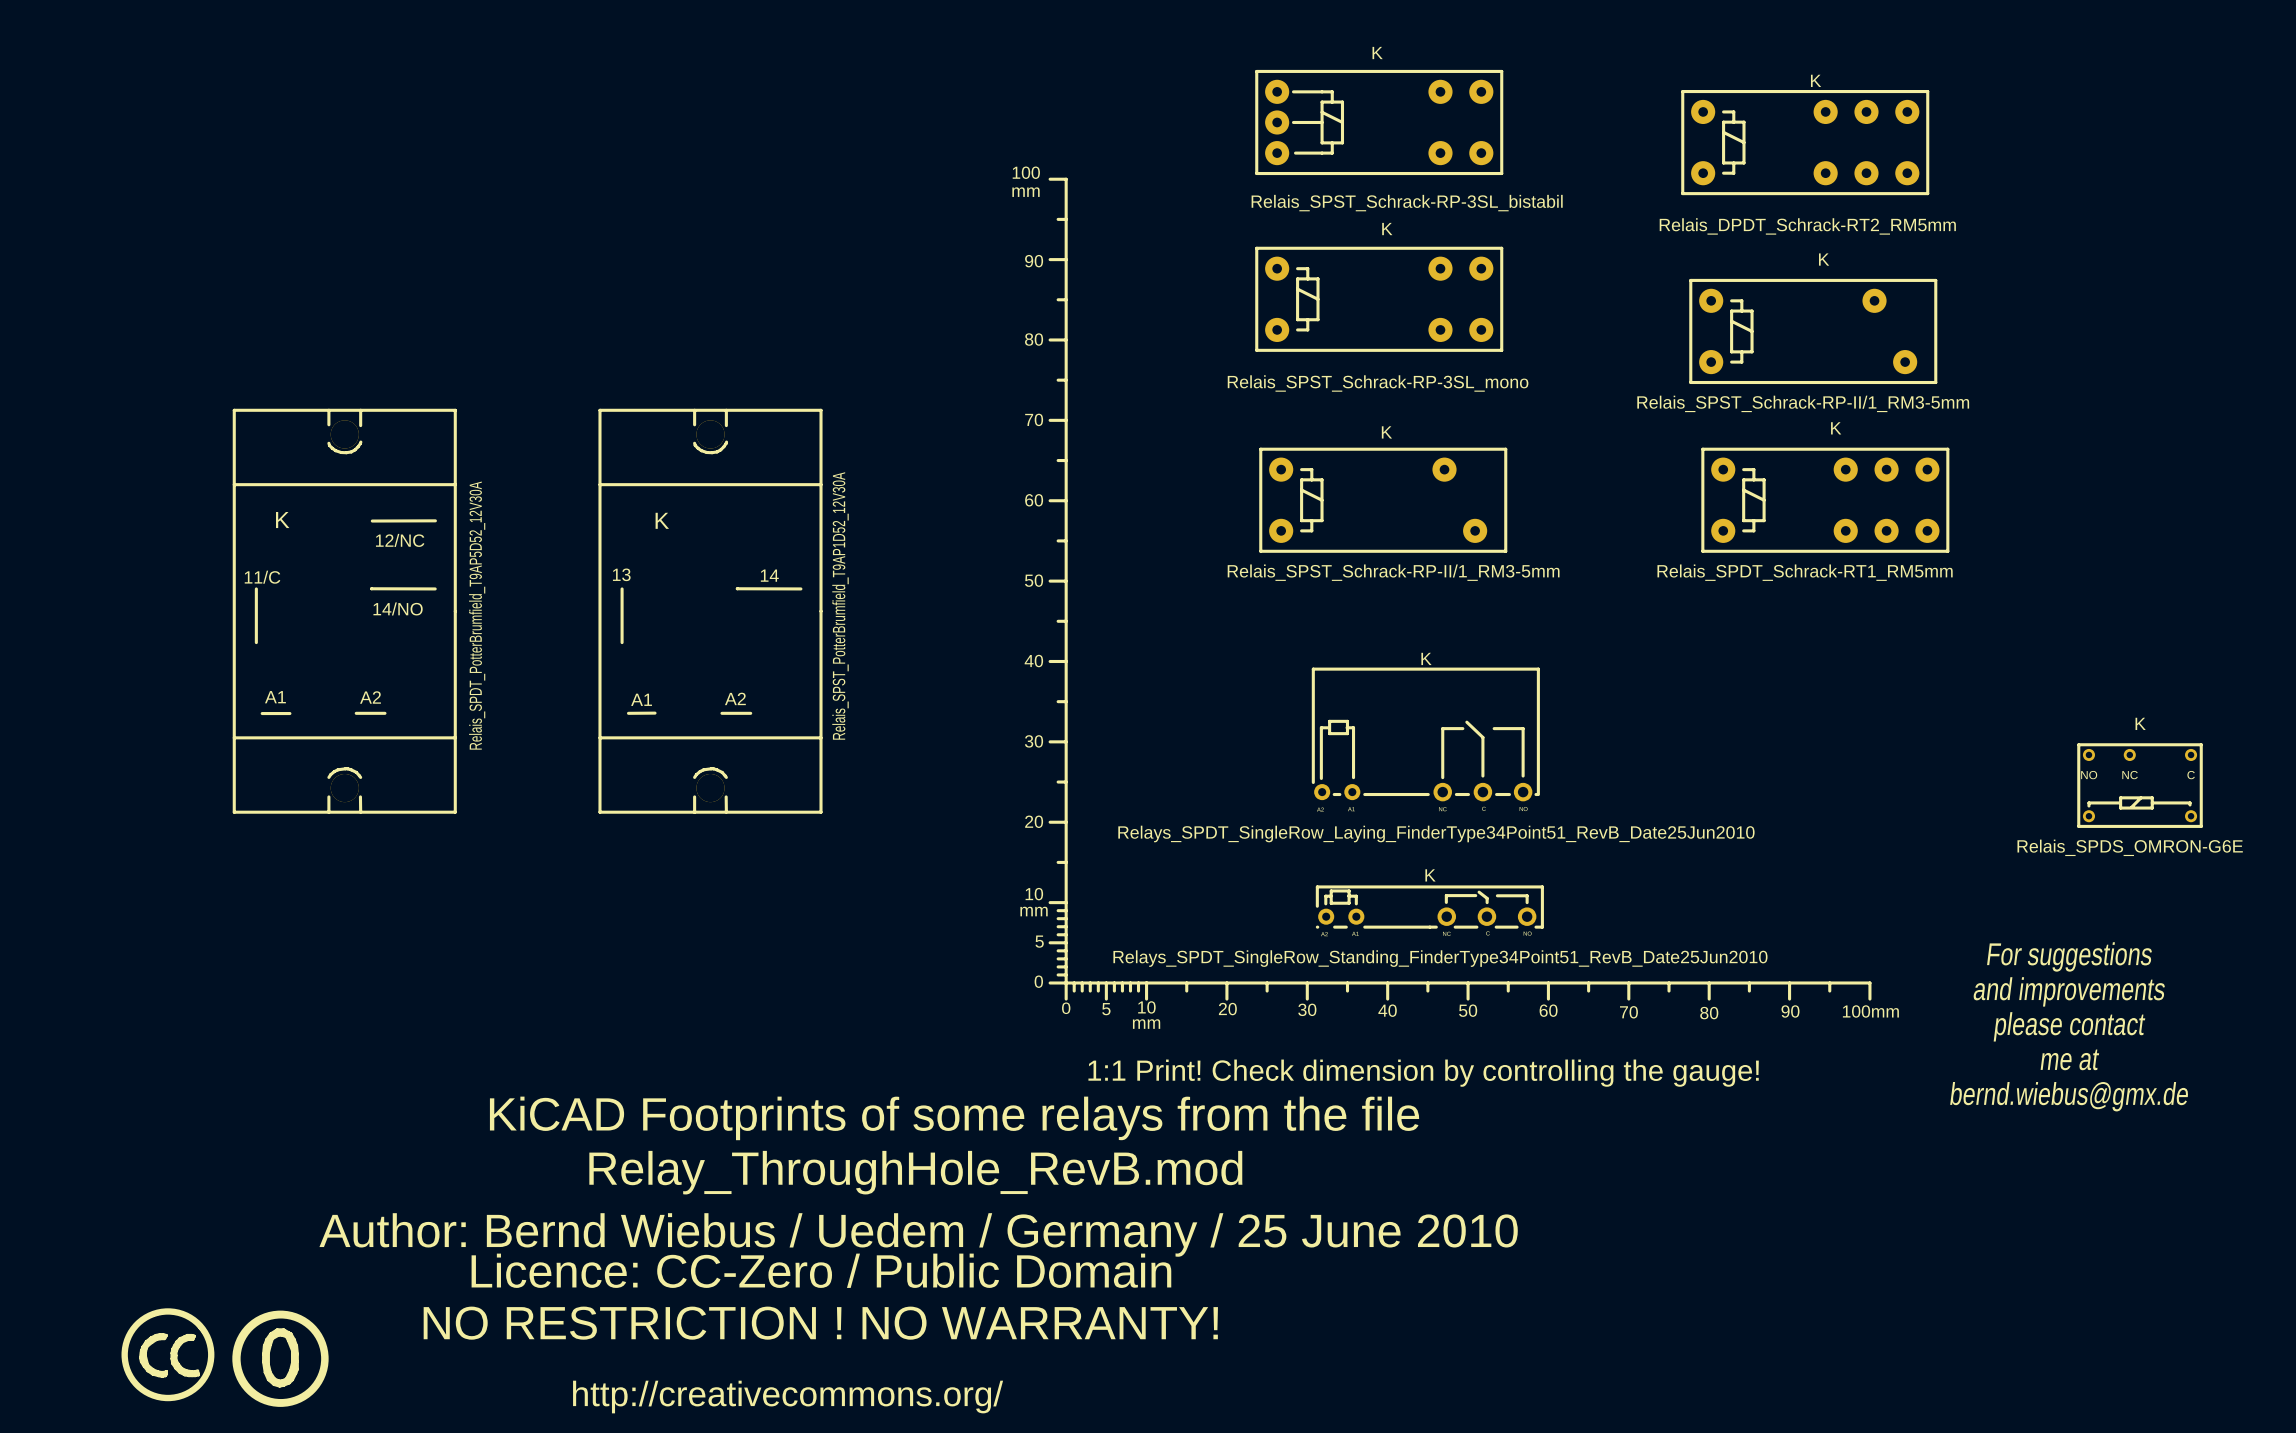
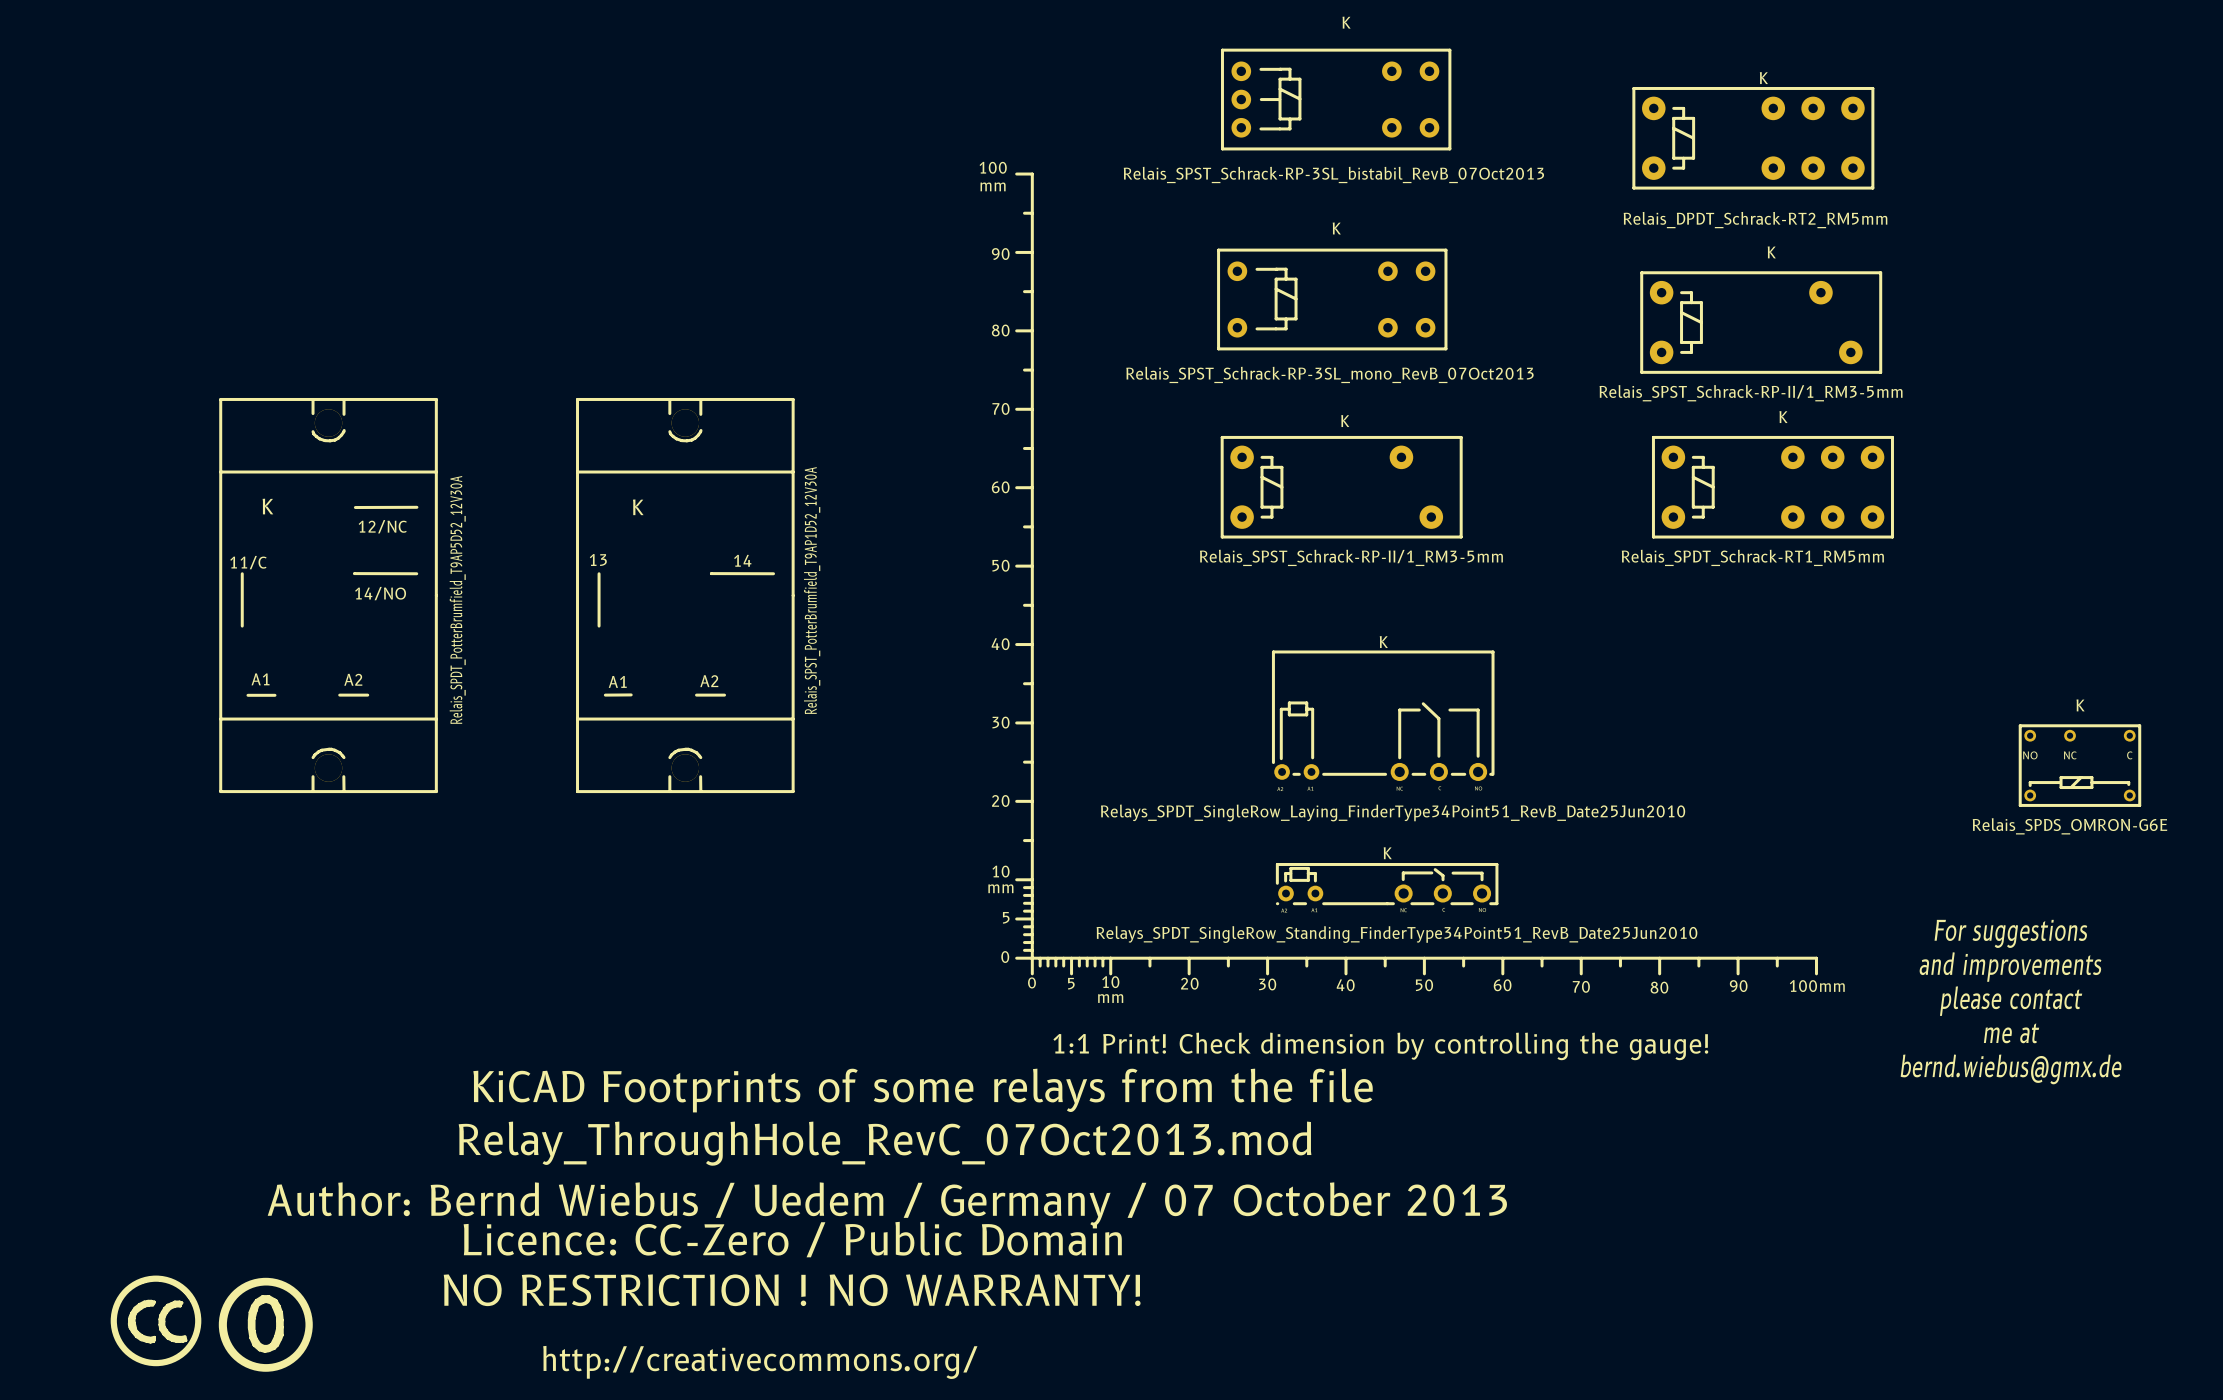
K: none -> Relais_SPST_Schrack-RP-3SL_bistabil_RevB_07Oct2013 (1336, 99)
K: Relais_SPST_Schrack-RP-3SL_bistabil (1379, 122) -> none
K: Relais_SPST_Schrack-RP-3SL_mono (1379, 299) -> none
K: none -> Relais_SPST_Schrack-RP-3SL_mono_RevB_07Oct2013 (1332, 299)
text: Relay_ThroughHole_RevB.mod (915, 1172) -> Relay_ThroughHole_RevC_07Oct2013.mod (885, 1143)
text: Author: Bernd Wiebus / Uedem / Germany / 25 June 2010 (918, 1234) -> Author: Bernd Wiebus / Uedem / Germany / 07 October 2013 (887, 1204)

